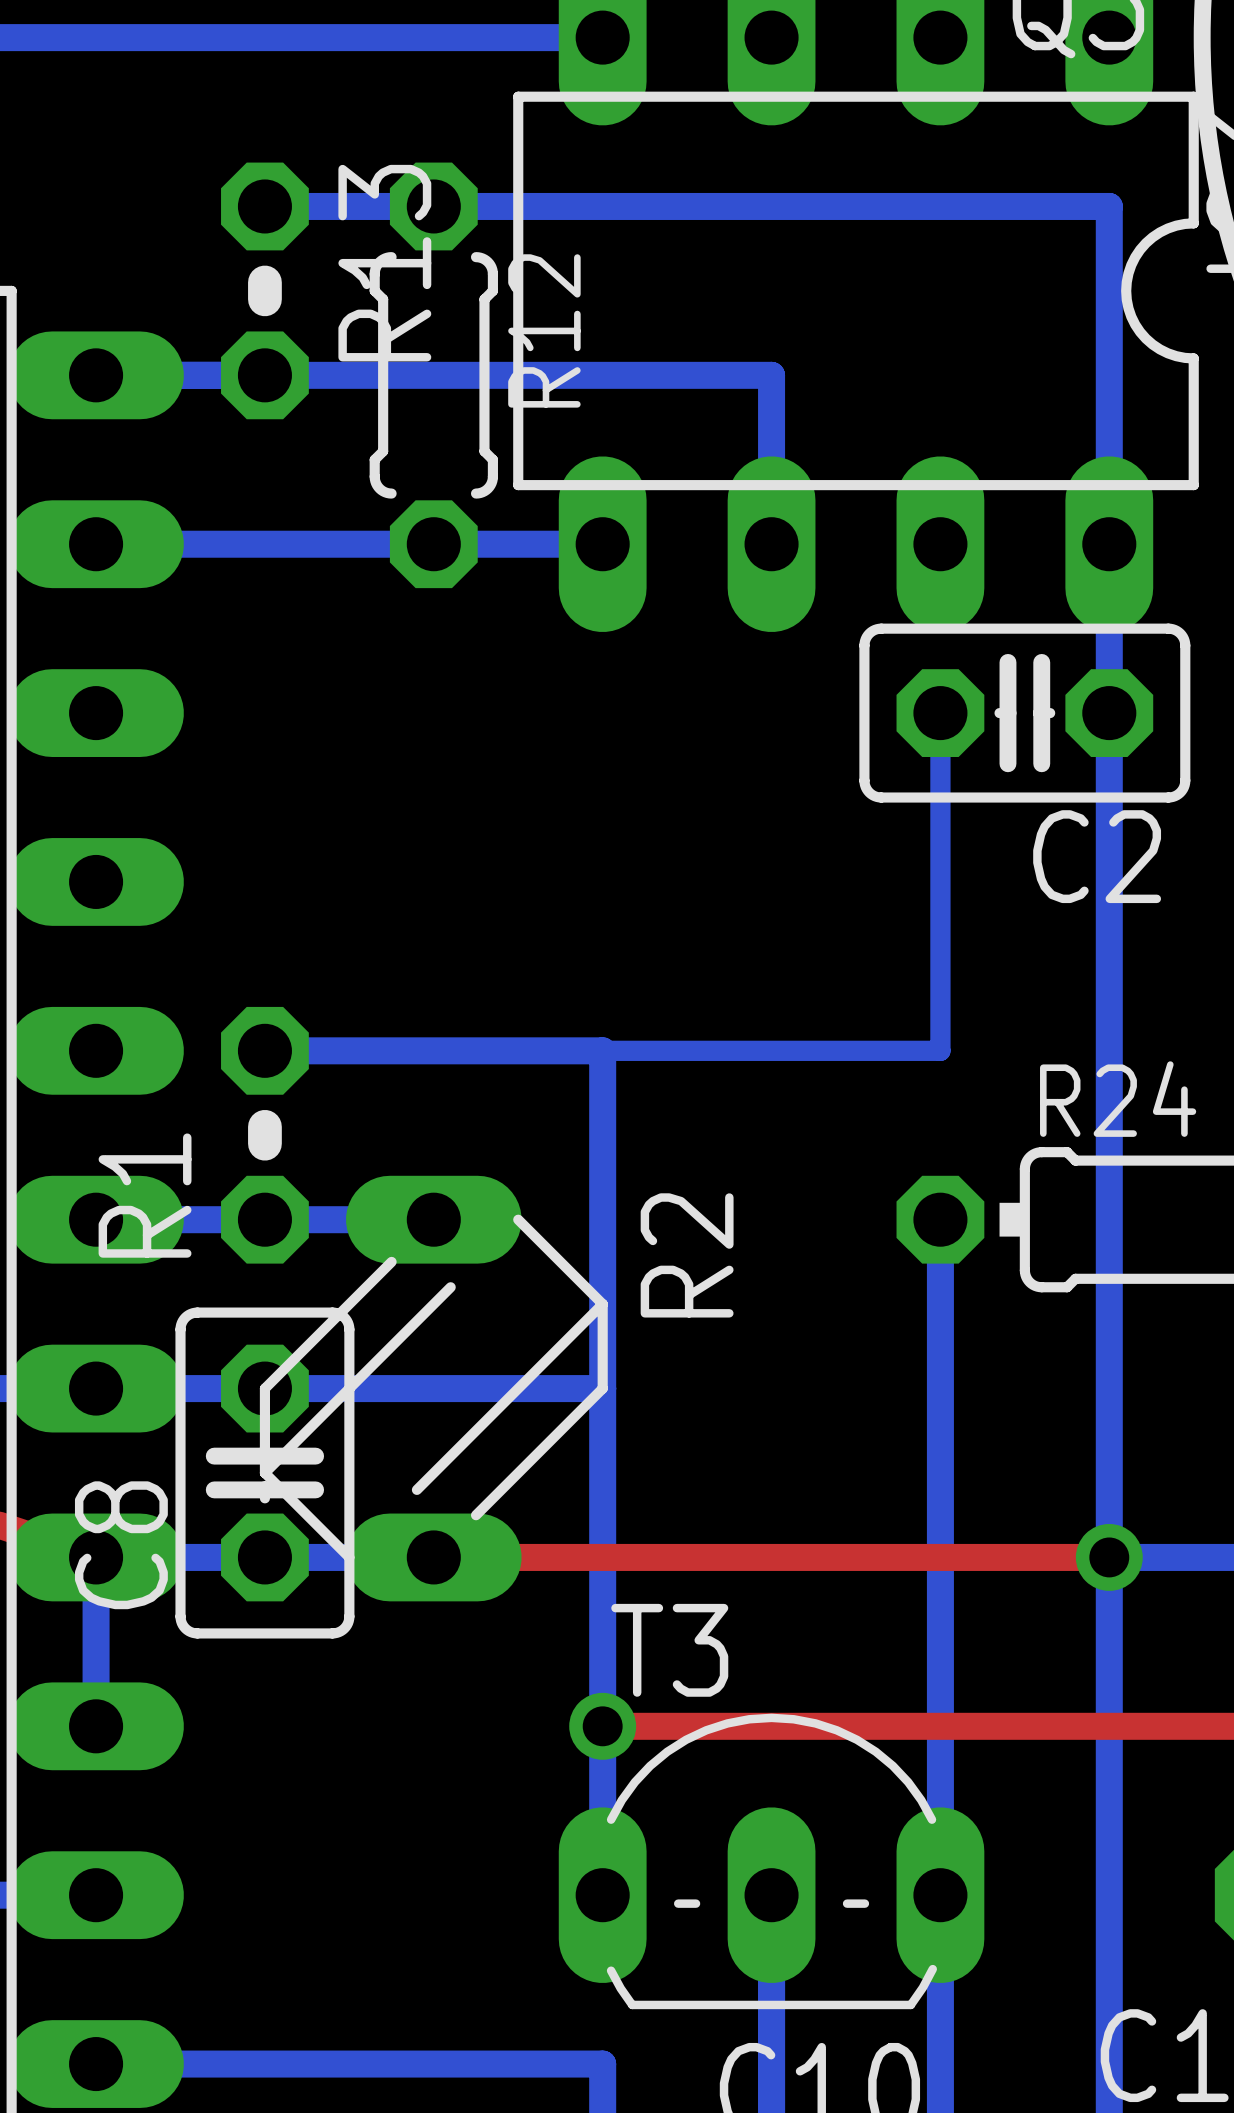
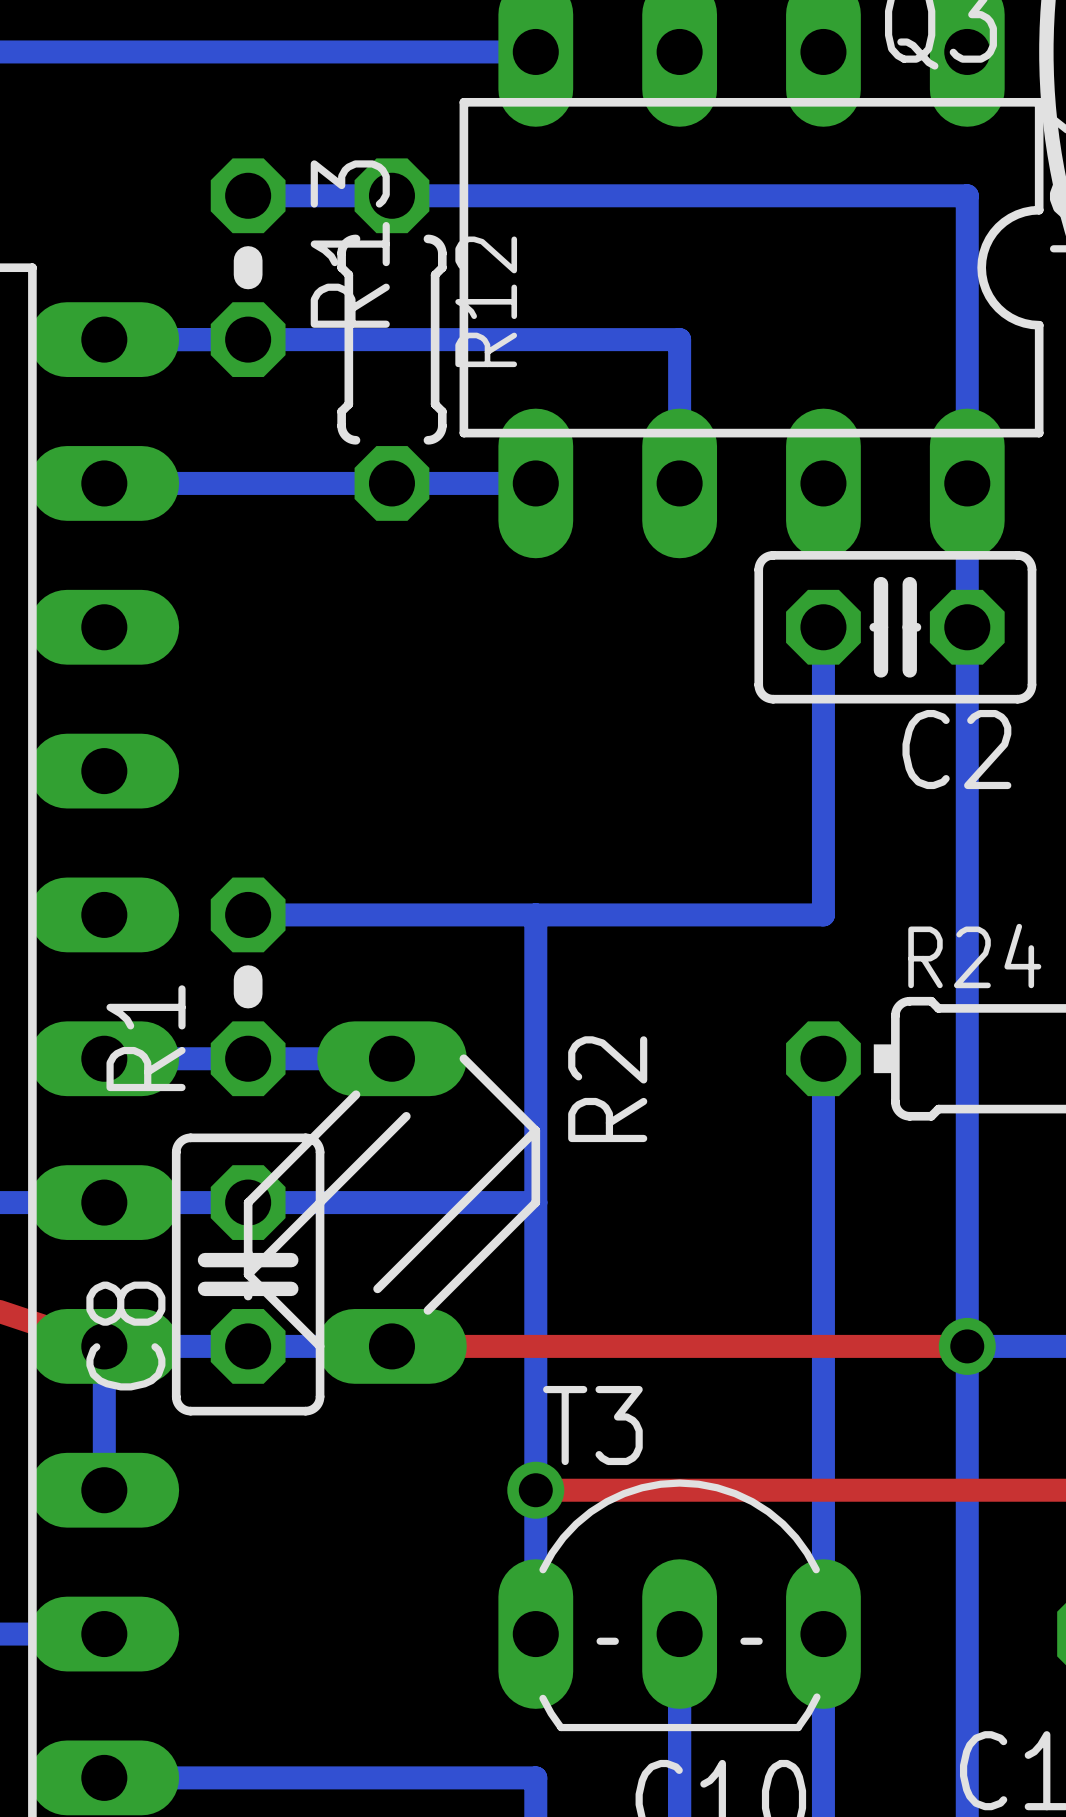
bottom track width: thin (940, 713) (940, 1050) (602, 1050) -> thick (823, 627) (823, 914) (535, 914)

